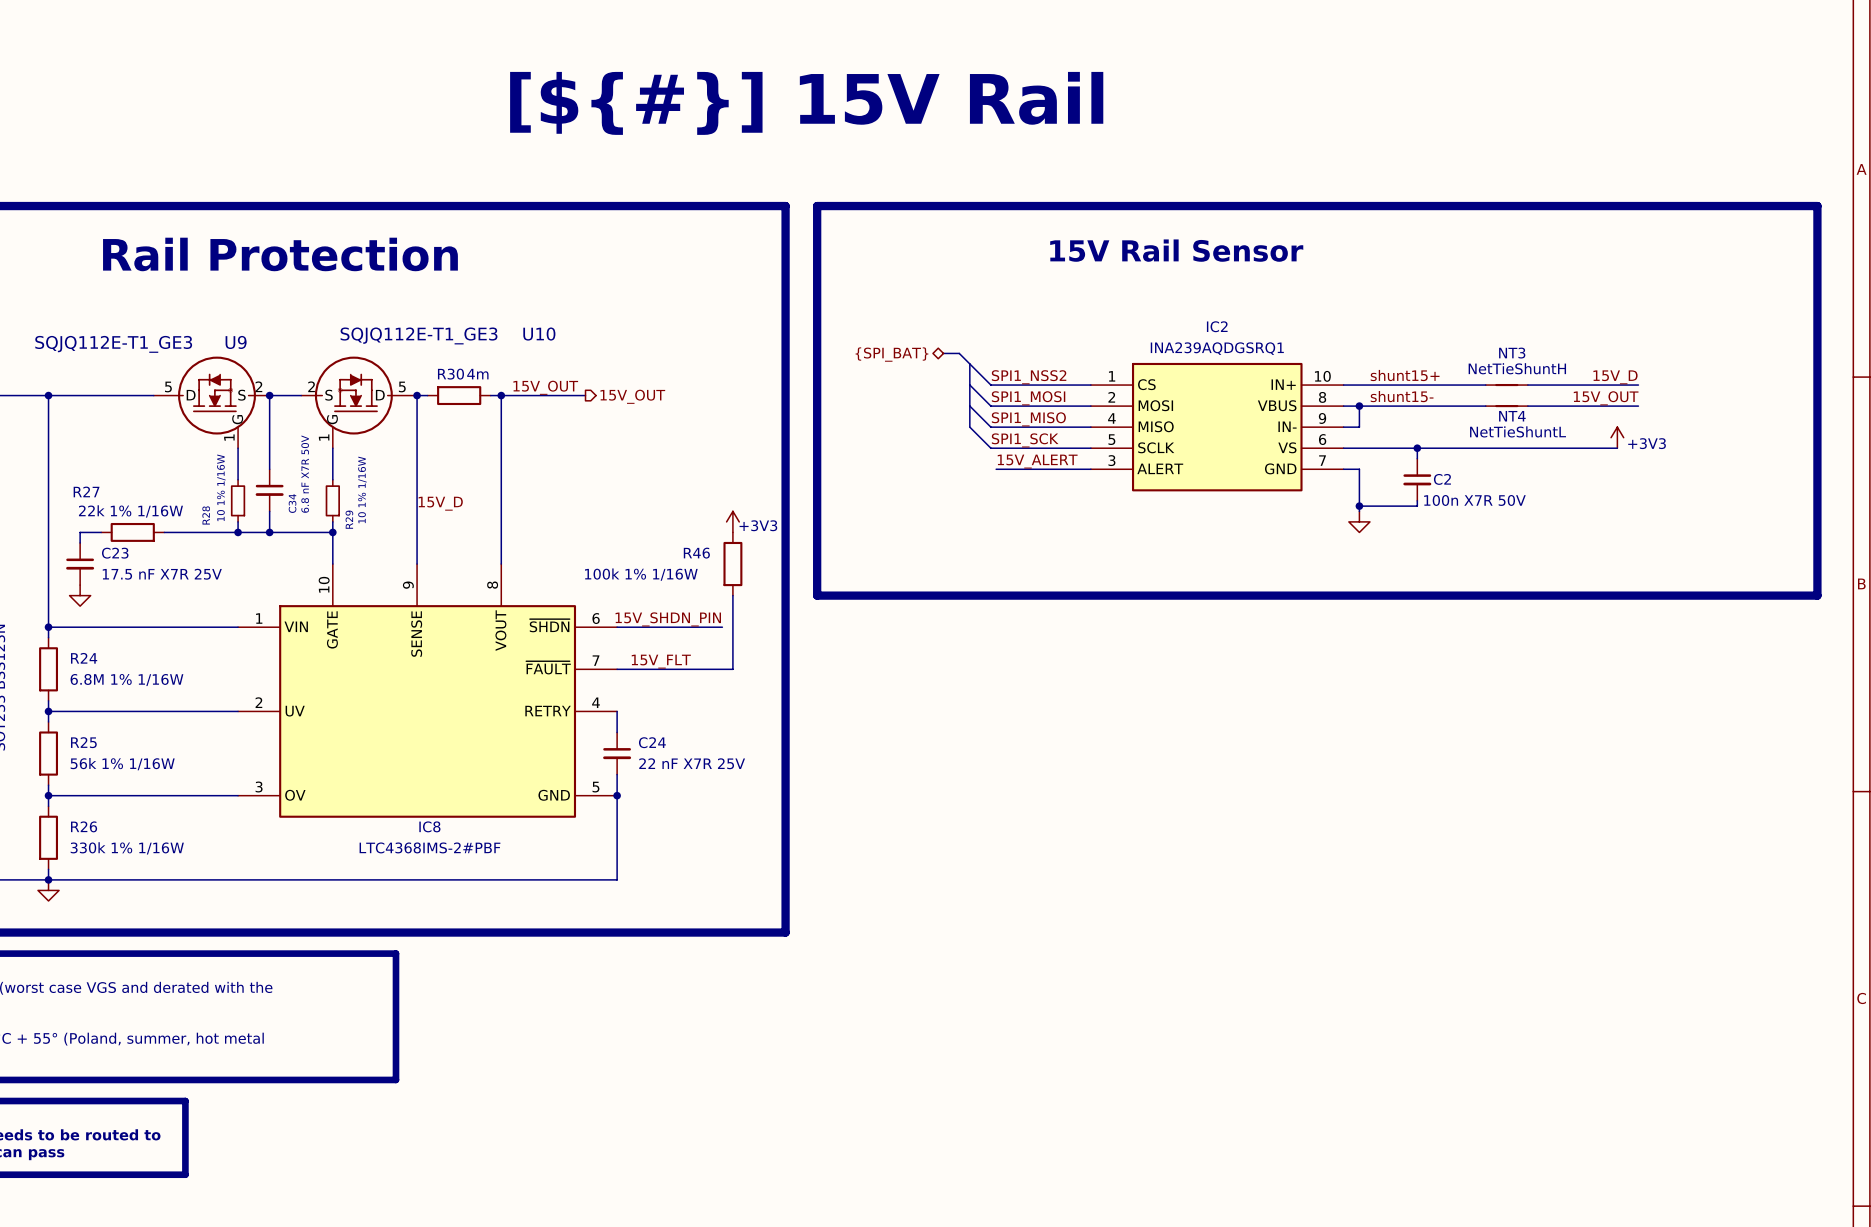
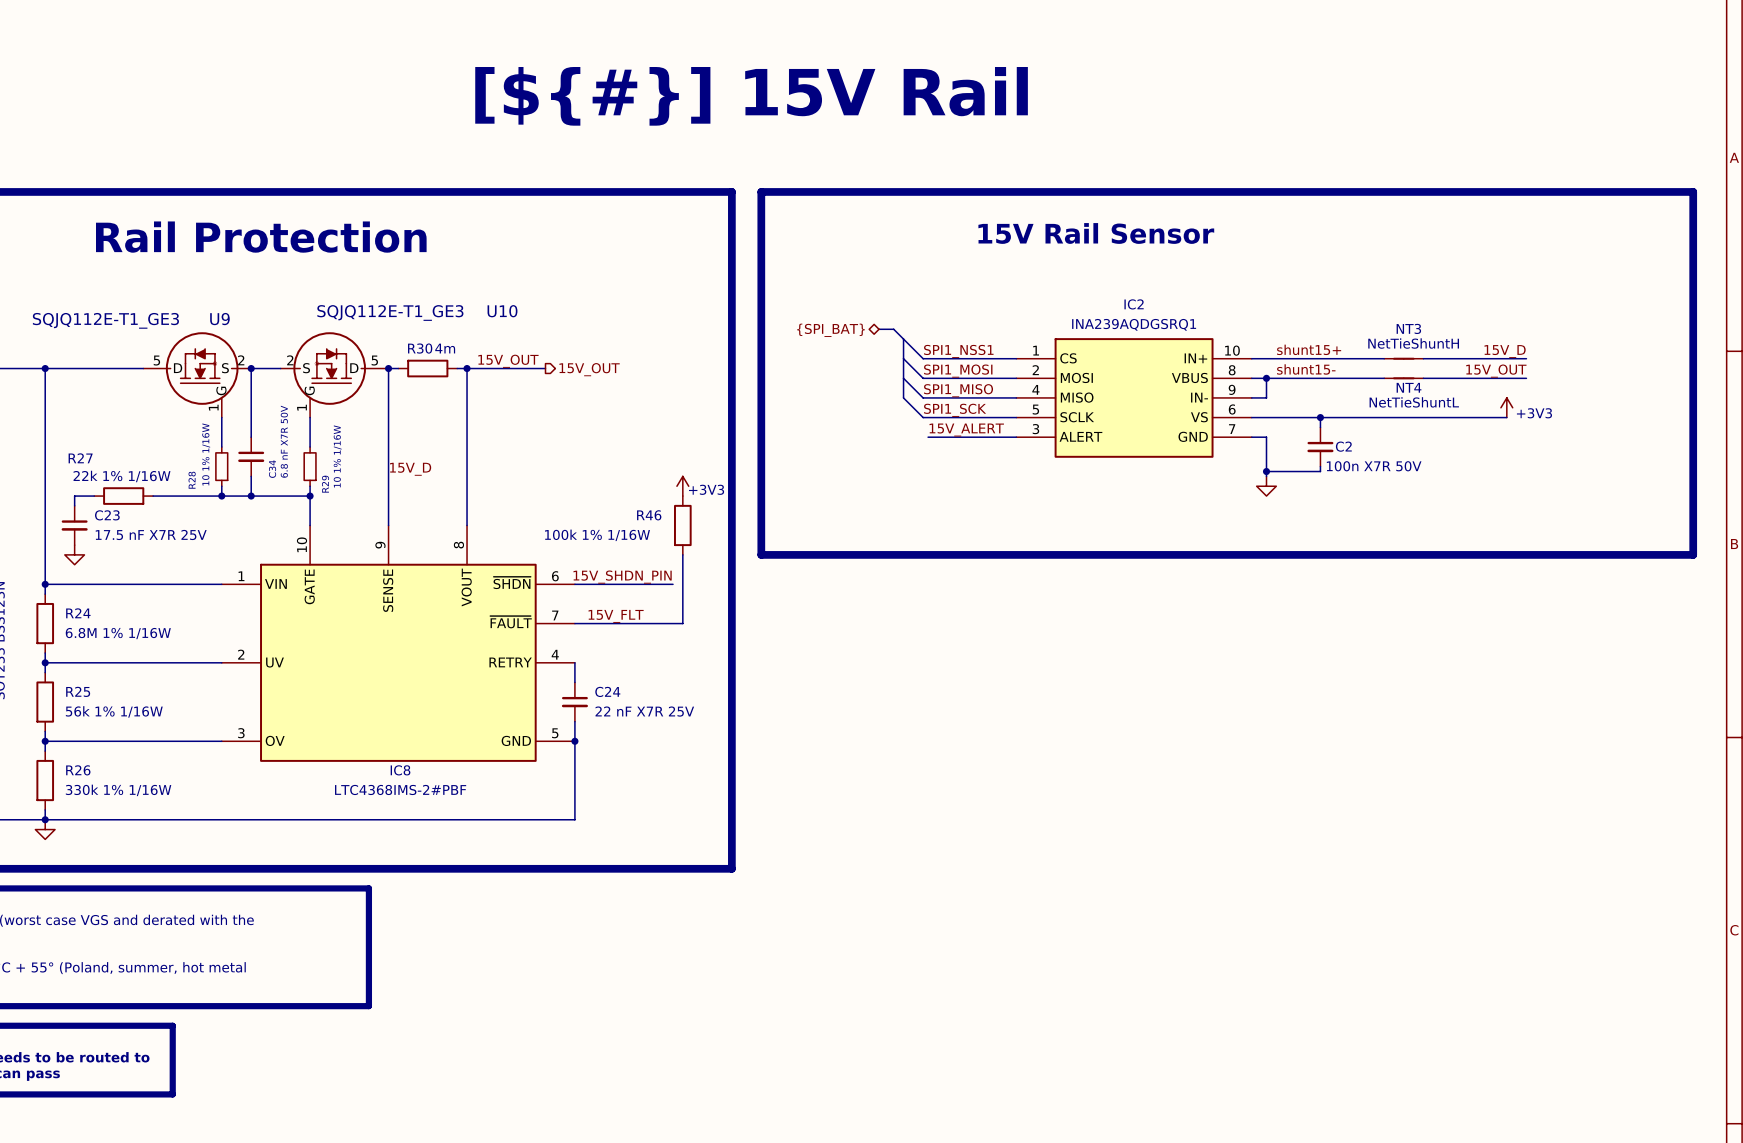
label: SPI1_NSS2 (1029, 377) -> SPI1_NSS1 (958, 351)

